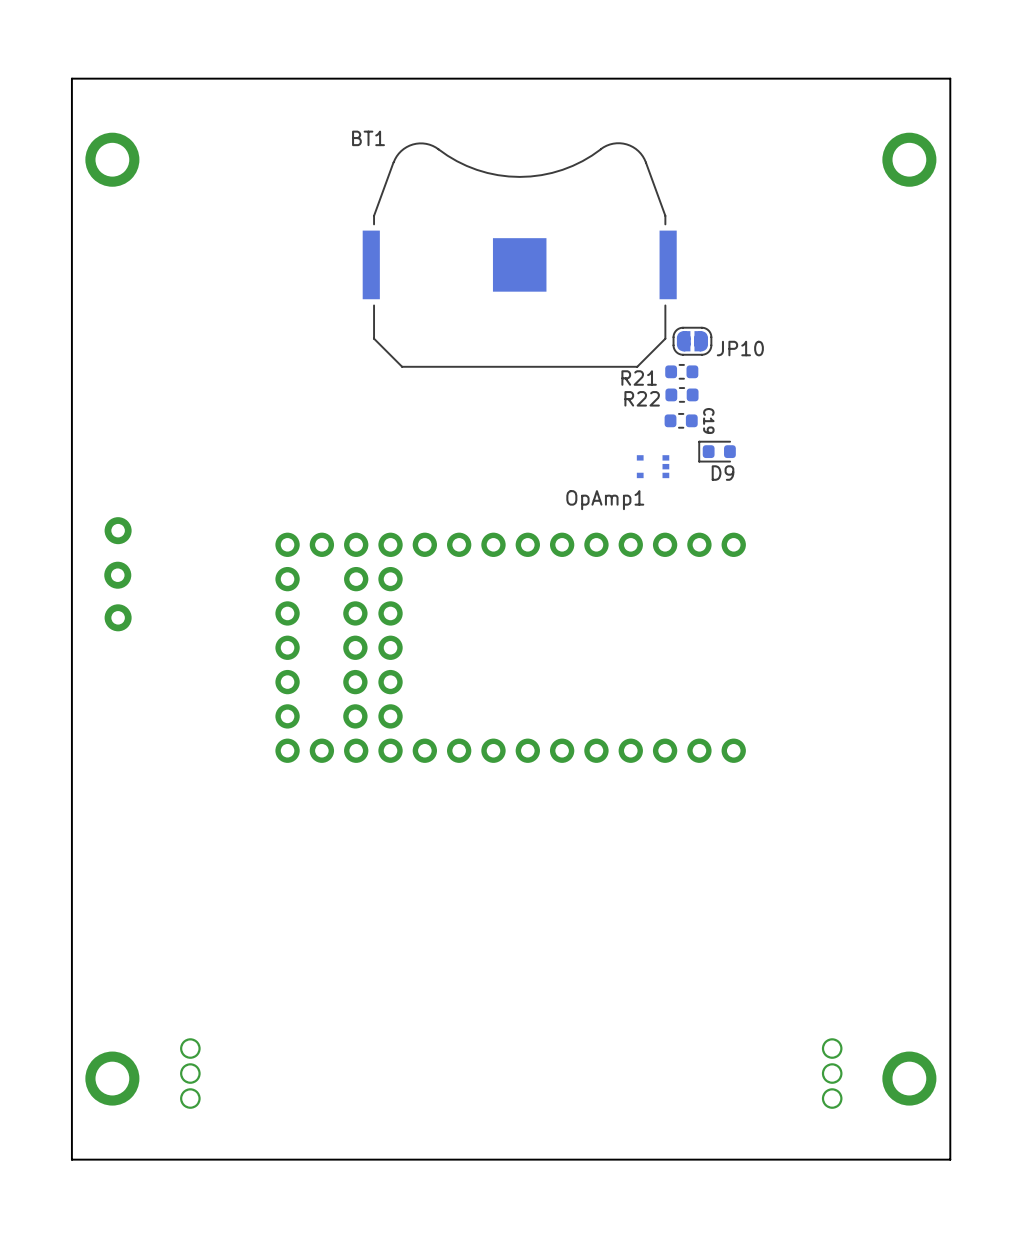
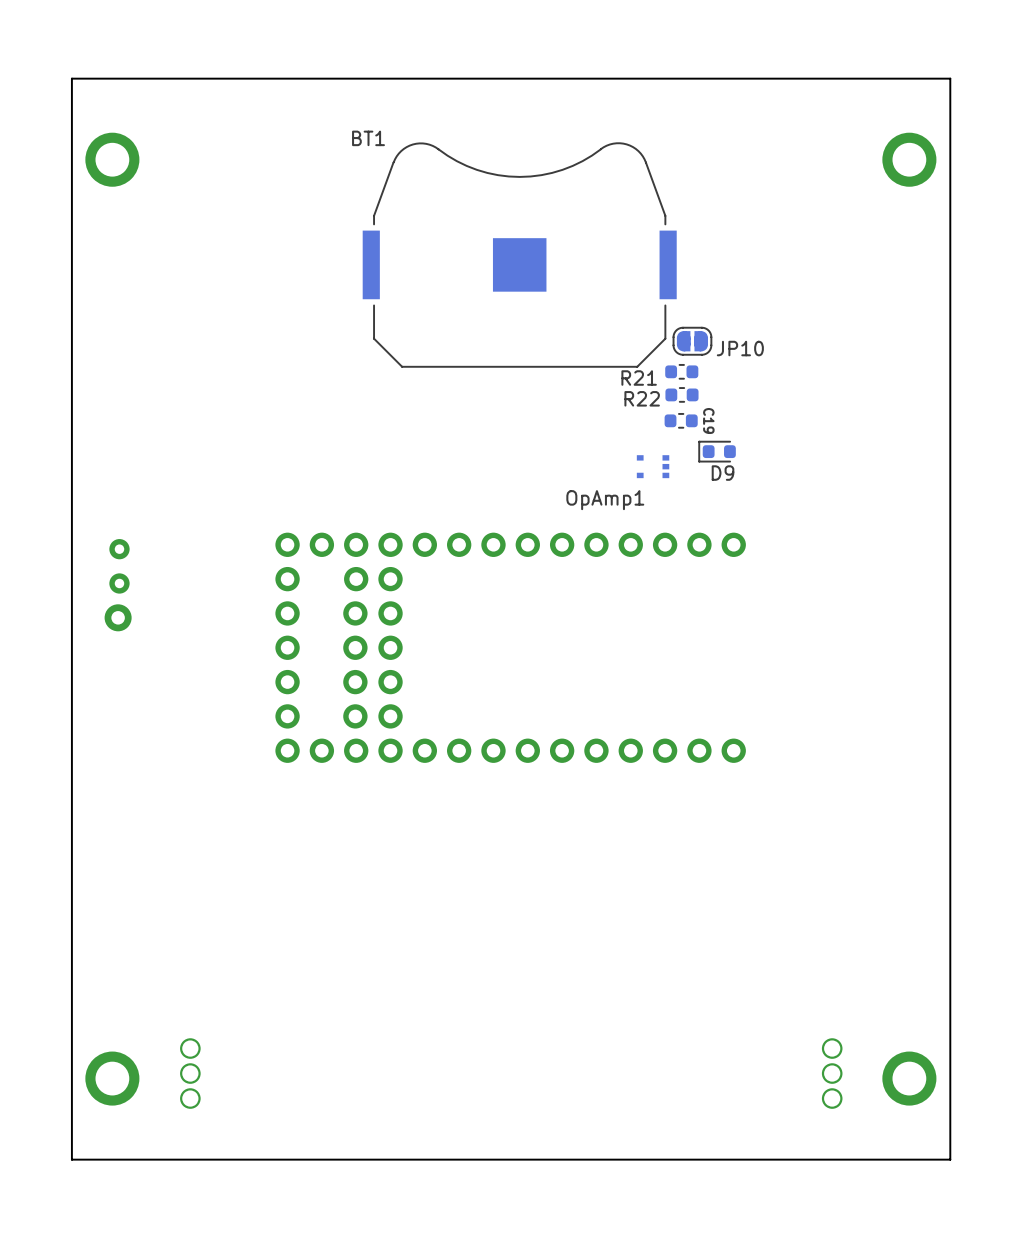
part: (118, 530) -> none
part: none -> (119, 549)
part footprint: [104, 561, 132, 589] -> [109, 573, 130, 594]

